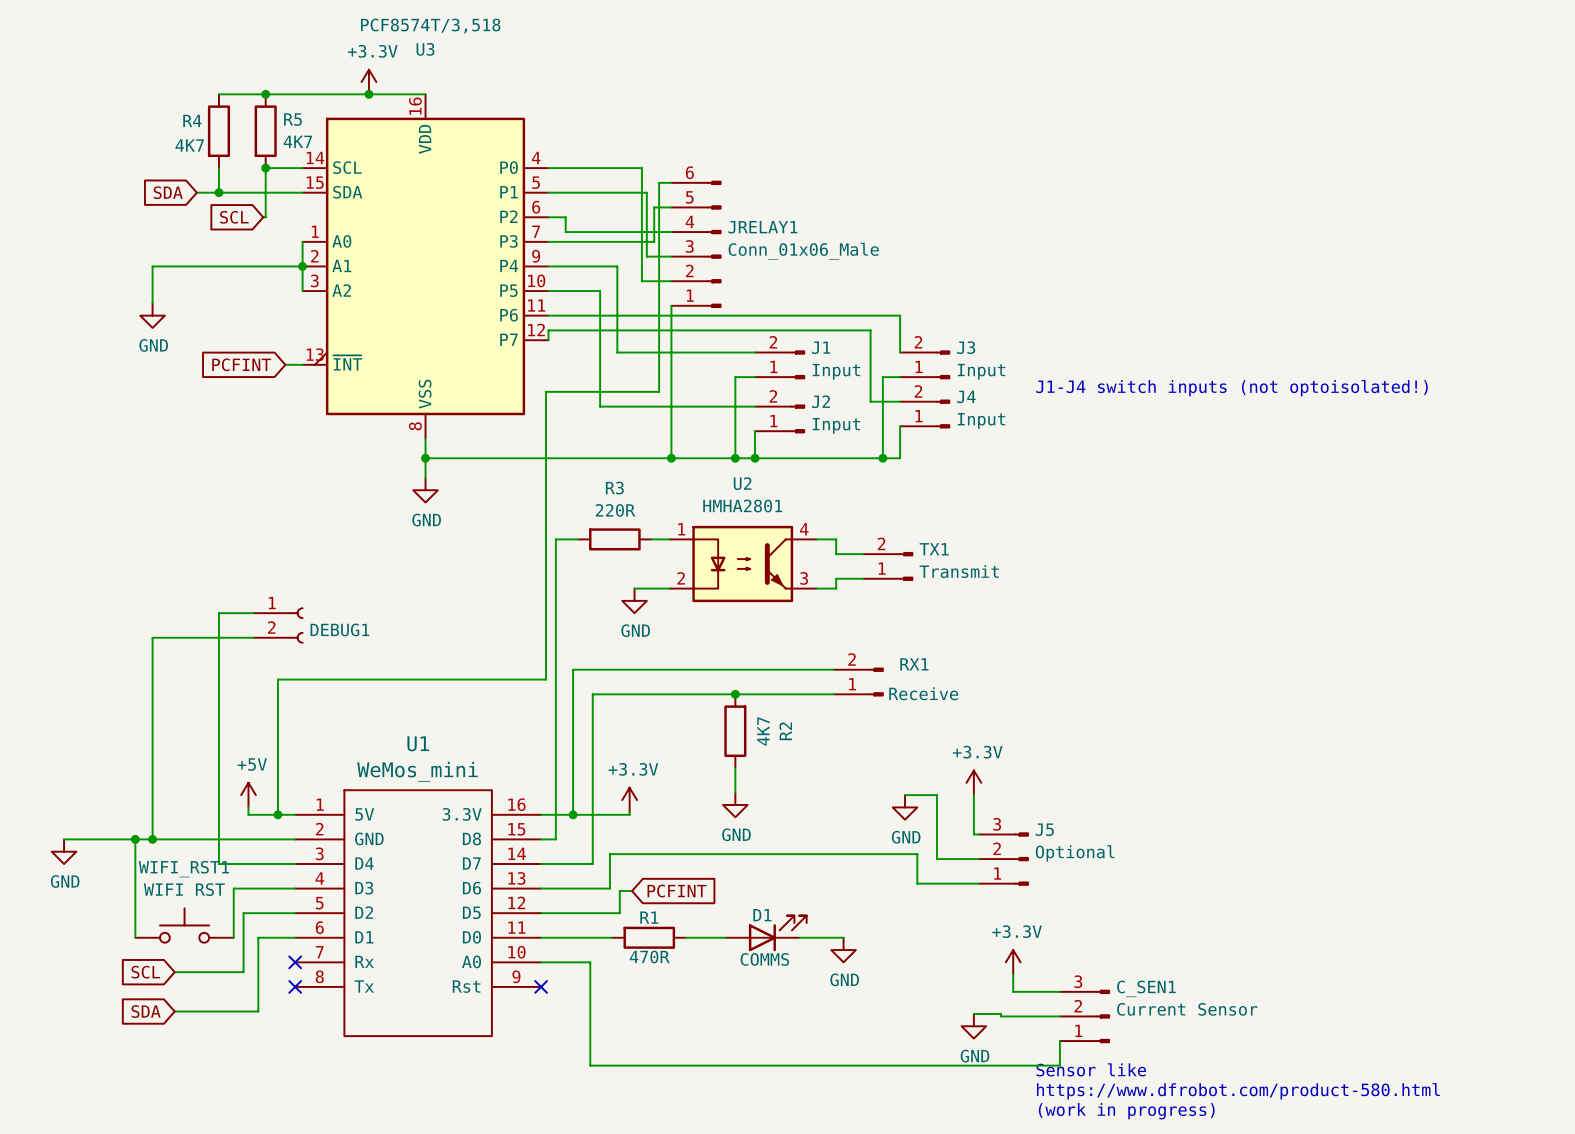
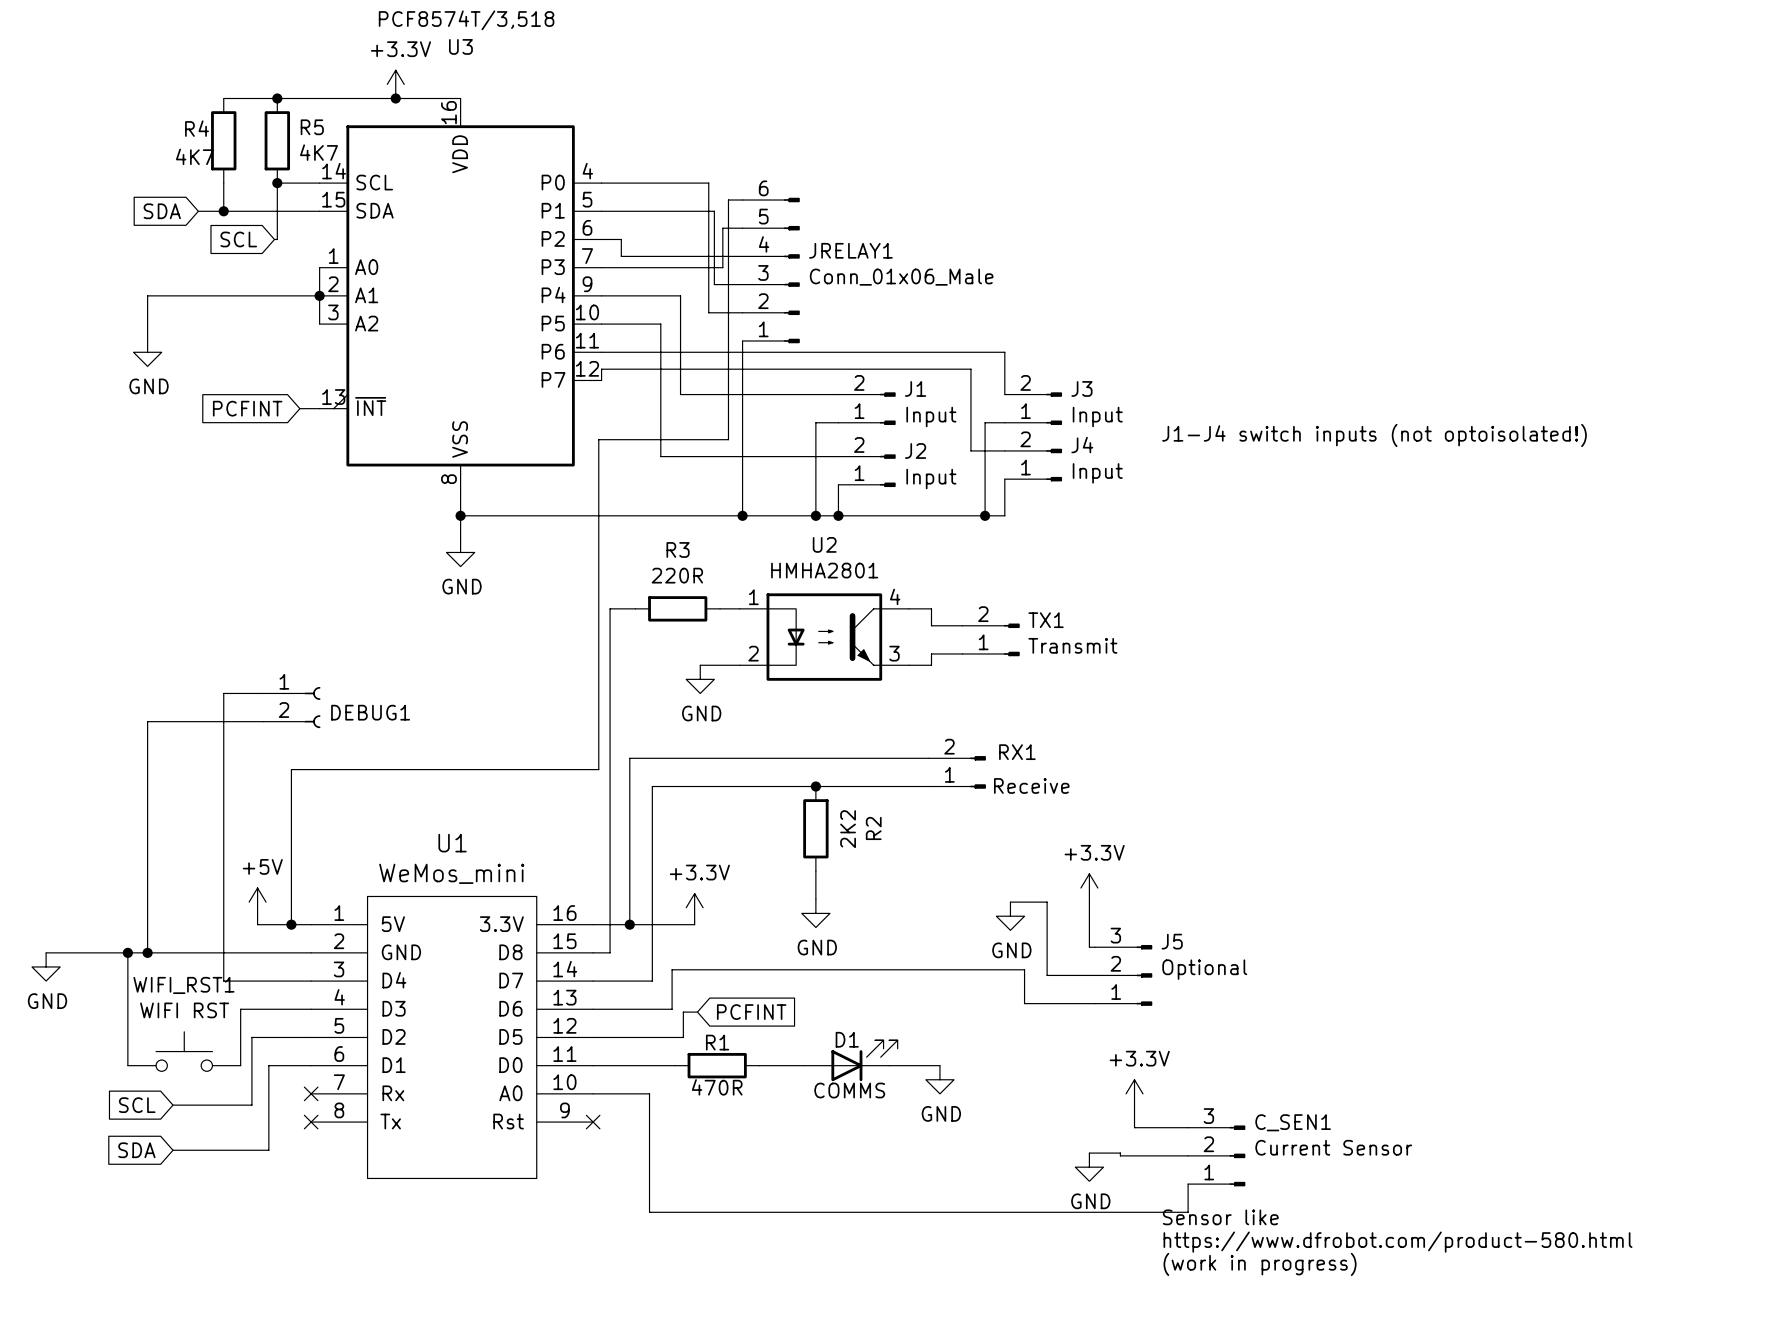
R2 value: 4K7 (763, 731) -> 2K2 (848, 829)

